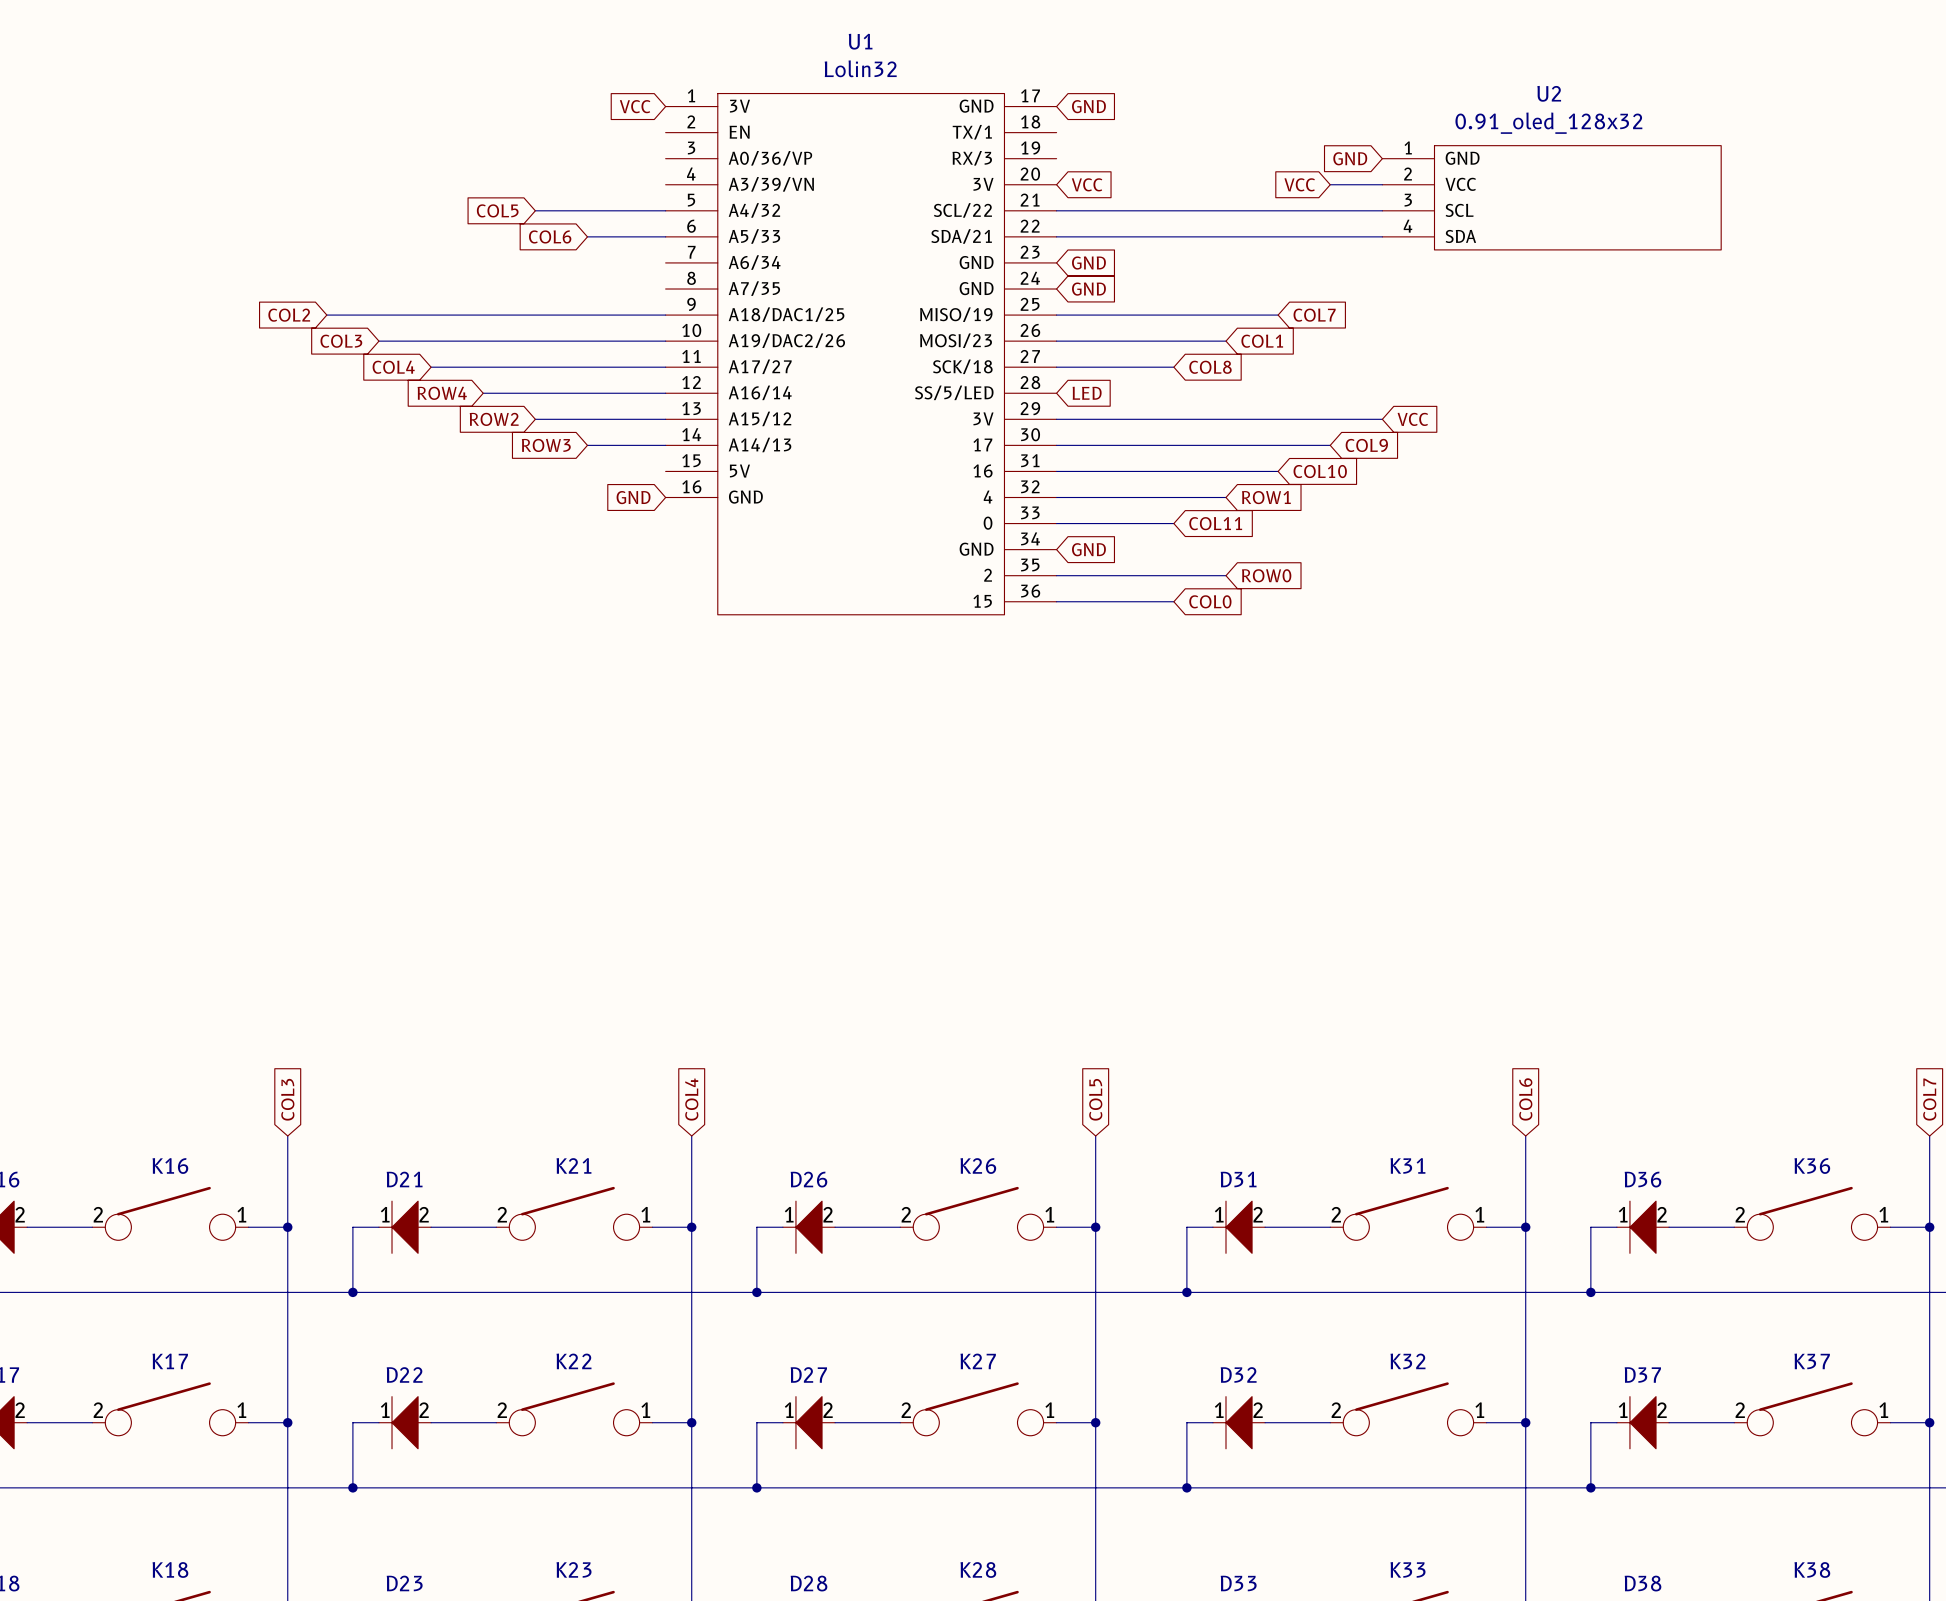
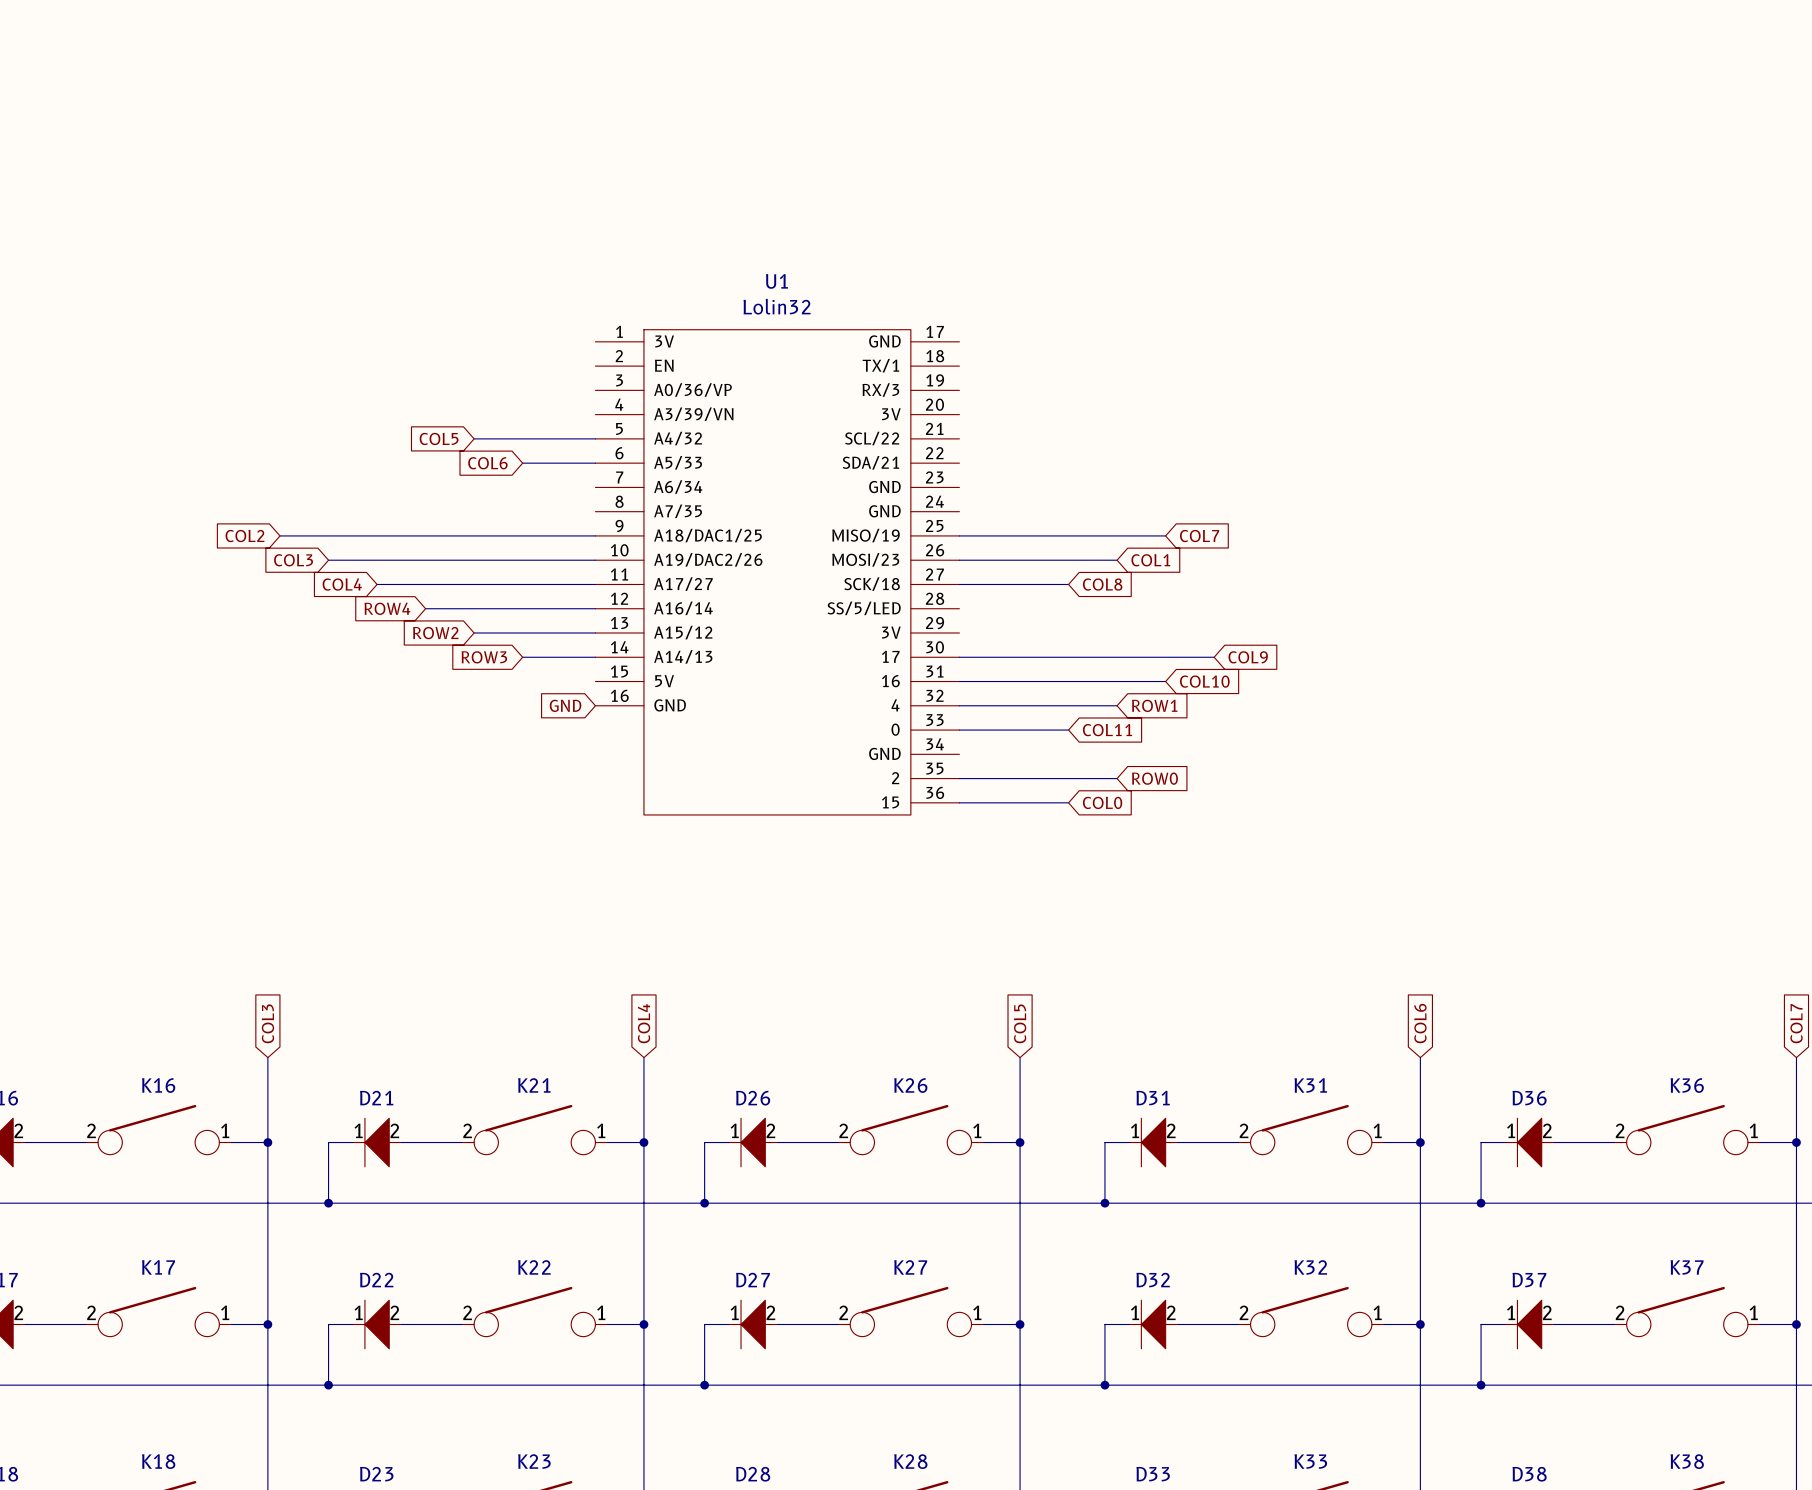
global label: VCC (635, 106) -> none
global label: GND (1088, 106) -> none
global label: GND (1350, 158) -> none
global label: VCC (1087, 184) -> none
global label: VCC (1299, 184) -> none
wire: (1330, 184) (1382, 184) -> none
U2: 0.91_oled_128x32 (1551, 197) -> none
global label: COL5 (497, 210) -> none
wire: (535, 210) (665, 210) -> none
wire: (1056, 210) (1382, 210) -> none
global label: COL6 (550, 236) -> none
wire: (587, 236) (665, 236) -> none
wire: (1056, 236) (1382, 236) -> none
global label: GND (1088, 263) -> none
global label: GND (1088, 289) -> none
global label: COL2 (289, 315) -> none
wire: (326, 315) (665, 315) -> none
wire: (1056, 315) (1278, 315) -> none
global label: COL7 (1314, 315) -> none
global label: COL3 (341, 341) -> none
wire: (378, 341) (665, 341) -> none
wire: (1056, 341) (1225, 341) -> none
global label: COL1 (1262, 341) -> none
U1 position: (861, 354) -> (777, 572)
global label: COL4 (393, 367) -> none
wire: (431, 367) (665, 367) -> none
wire: (1056, 367) (1173, 367) -> none
global label: COL8 (1210, 367) -> none
global label: ROW4 (442, 393) -> none
wire: (483, 393) (665, 393) -> none
global label: LED (1087, 393) -> none
global label: ROW2 (494, 419) -> none
wire: (535, 419) (665, 419) -> (474, 438) (595, 438)
wire: (1056, 419) (1382, 419) -> none
global label: VCC (1412, 419) -> none
global label: ROW3 (546, 445) -> none
wire: (587, 445) (665, 445) -> (522, 463) (595, 463)
wire: (1056, 445) (1330, 445) -> none
global label: COL9 (1366, 445) -> none
global label: none -> COL5 (439, 438)
wire: (1056, 471) (1278, 471) -> none
global label: COL10 (1320, 471) -> none
global label: none -> COL6 (487, 463)
global label: GND (633, 497) -> none
wire: (1056, 497) (1225, 497) -> none
global label: ROW1 (1266, 497) -> none
wire: (1056, 523) (1173, 523) -> (959, 584) (1068, 584)
global label: COL11 (1215, 523) -> none
global label: GND (1088, 549) -> none
global label: none -> COL2 (245, 536)
wire: none -> (280, 535) (595, 535)
wire: none -> (1141, 535) (1165, 535)
global label: ROW0 (1266, 575) -> none
global label: none -> COL7 (1199, 536)
global label: none -> COL3 (293, 560)
wire: none -> (328, 560) (595, 560)
wire: none -> (1092, 560) (1117, 560)
global label: COL0 (1210, 601) -> none
global label: none -> COL1 (1150, 560)
global label: none -> COL4 (342, 584)
wire: none -> (377, 584) (595, 584)
global label: none -> COL8 (1102, 584)
global label: none -> ROW4 (387, 608)
wire: none -> (425, 608) (595, 608)
wire: none -> (474, 633) (595, 633)
global label: none -> ROW2 (435, 633)
global label: none -> ROW3 (484, 657)
wire: none -> (522, 657) (595, 657)
wire: none -> (959, 657) (1214, 657)
global label: none -> COL9 (1248, 657)
wire: none -> (959, 681) (1165, 681)
global label: none -> COL10 (1204, 681)
global label: none -> GND (565, 705)
wire: none -> (959, 705) (1117, 705)
global label: none -> ROW1 (1154, 705)
wire: none -> (959, 730) (1068, 730)
global label: none -> COL11 (1107, 730)
wire: none -> (959, 778) (1117, 778)
global label: none -> ROW0 (1154, 778)
wire: none -> (959, 802) (1068, 802)
global label: none -> COL0 (1102, 802)

